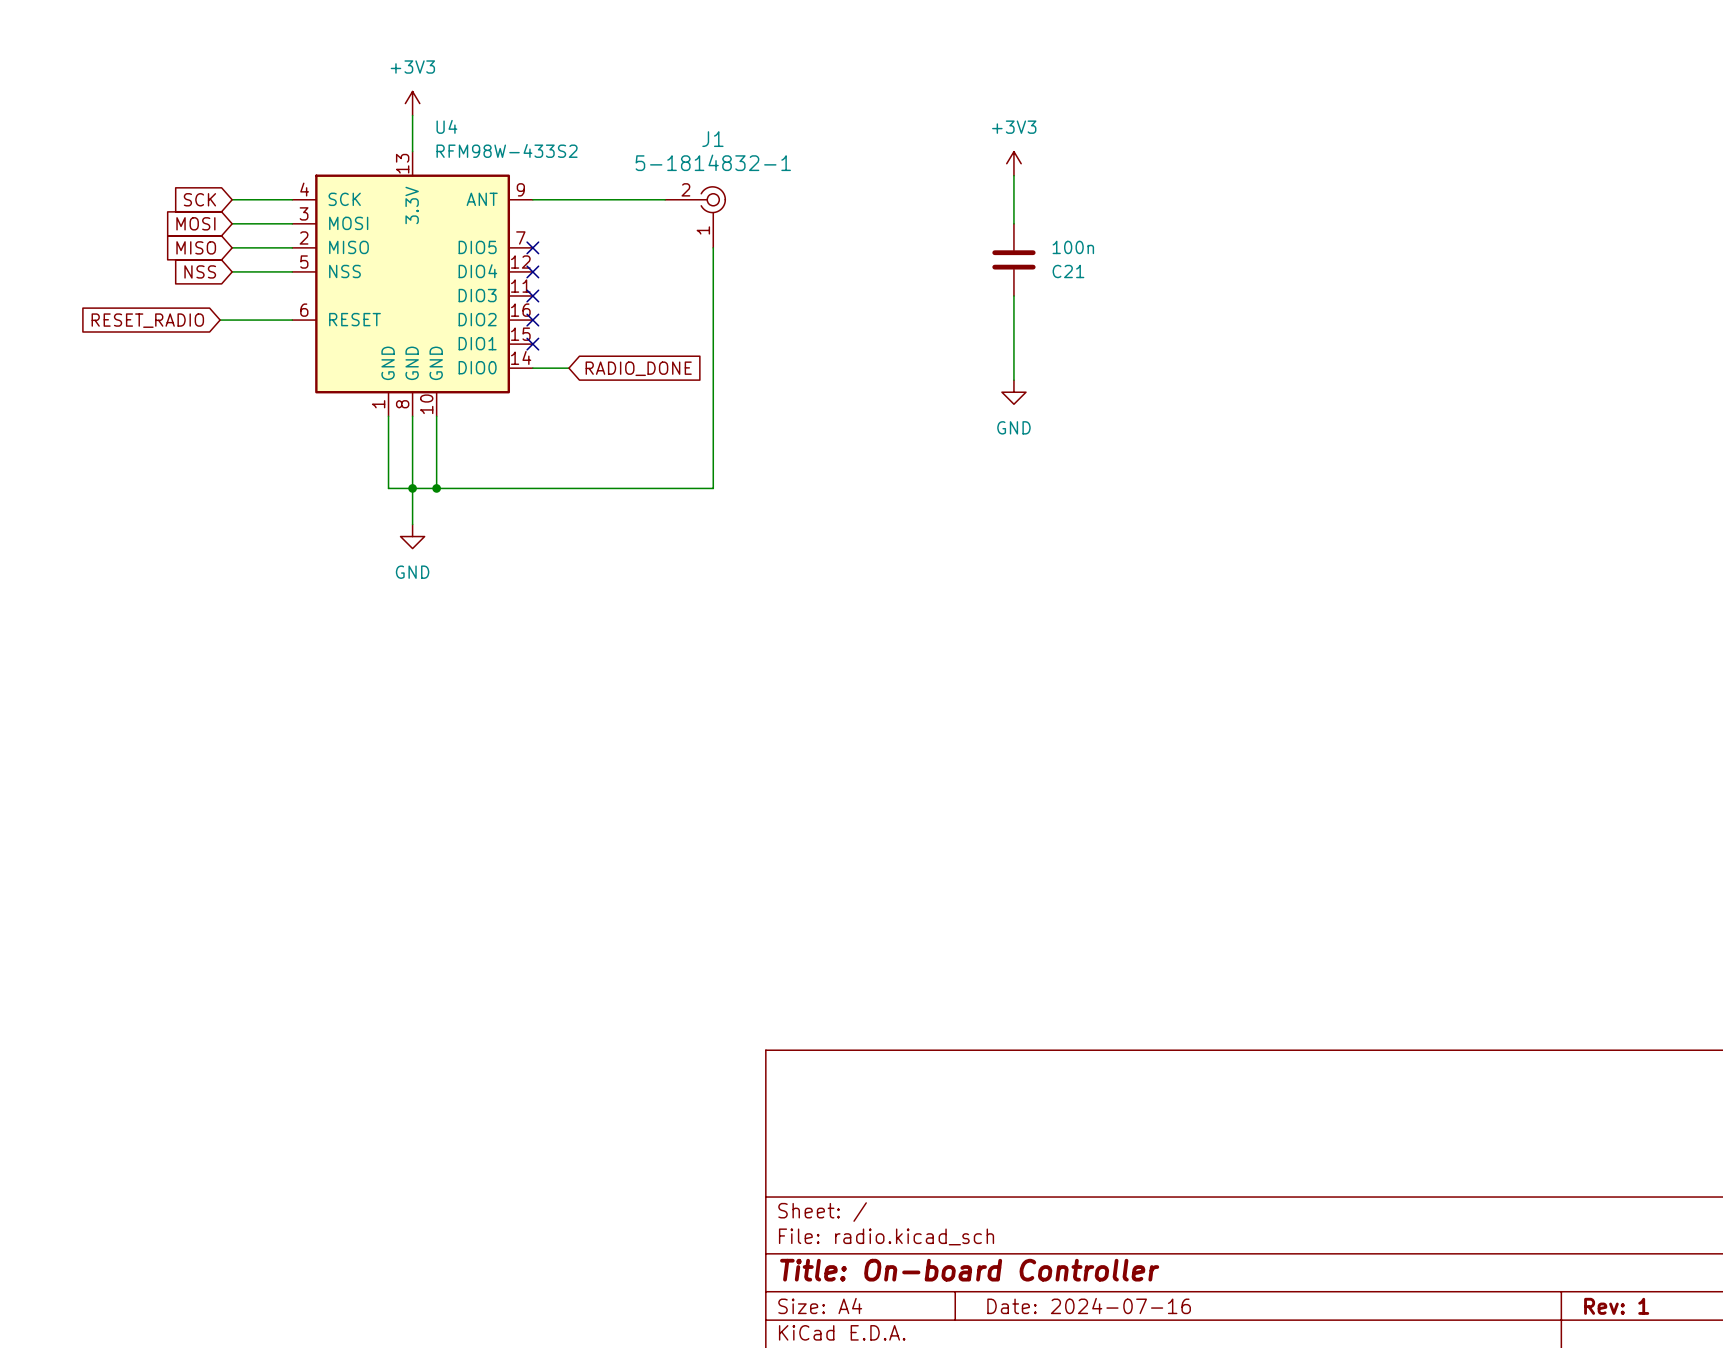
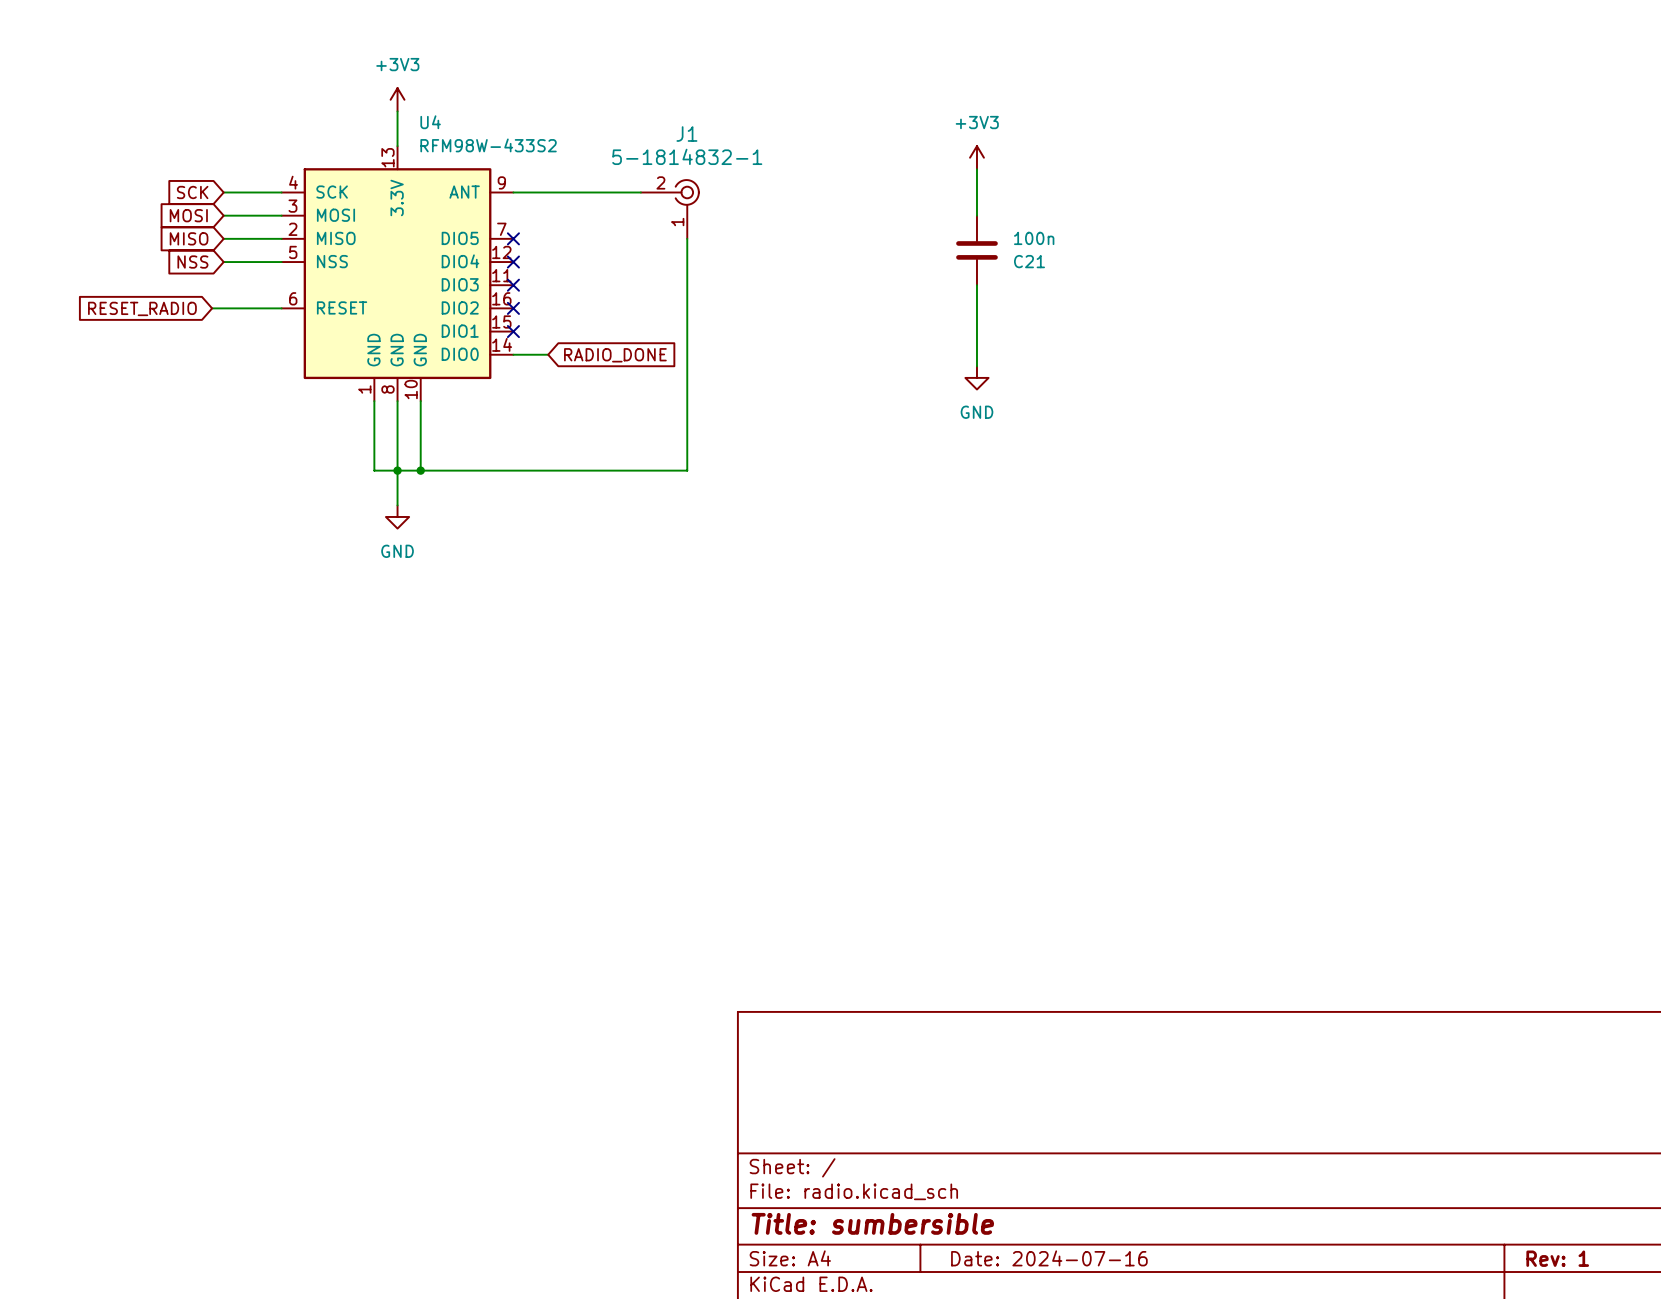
title block: Title: On-board Controller (969, 1270) -> Title: sumbersible (872, 1223)

